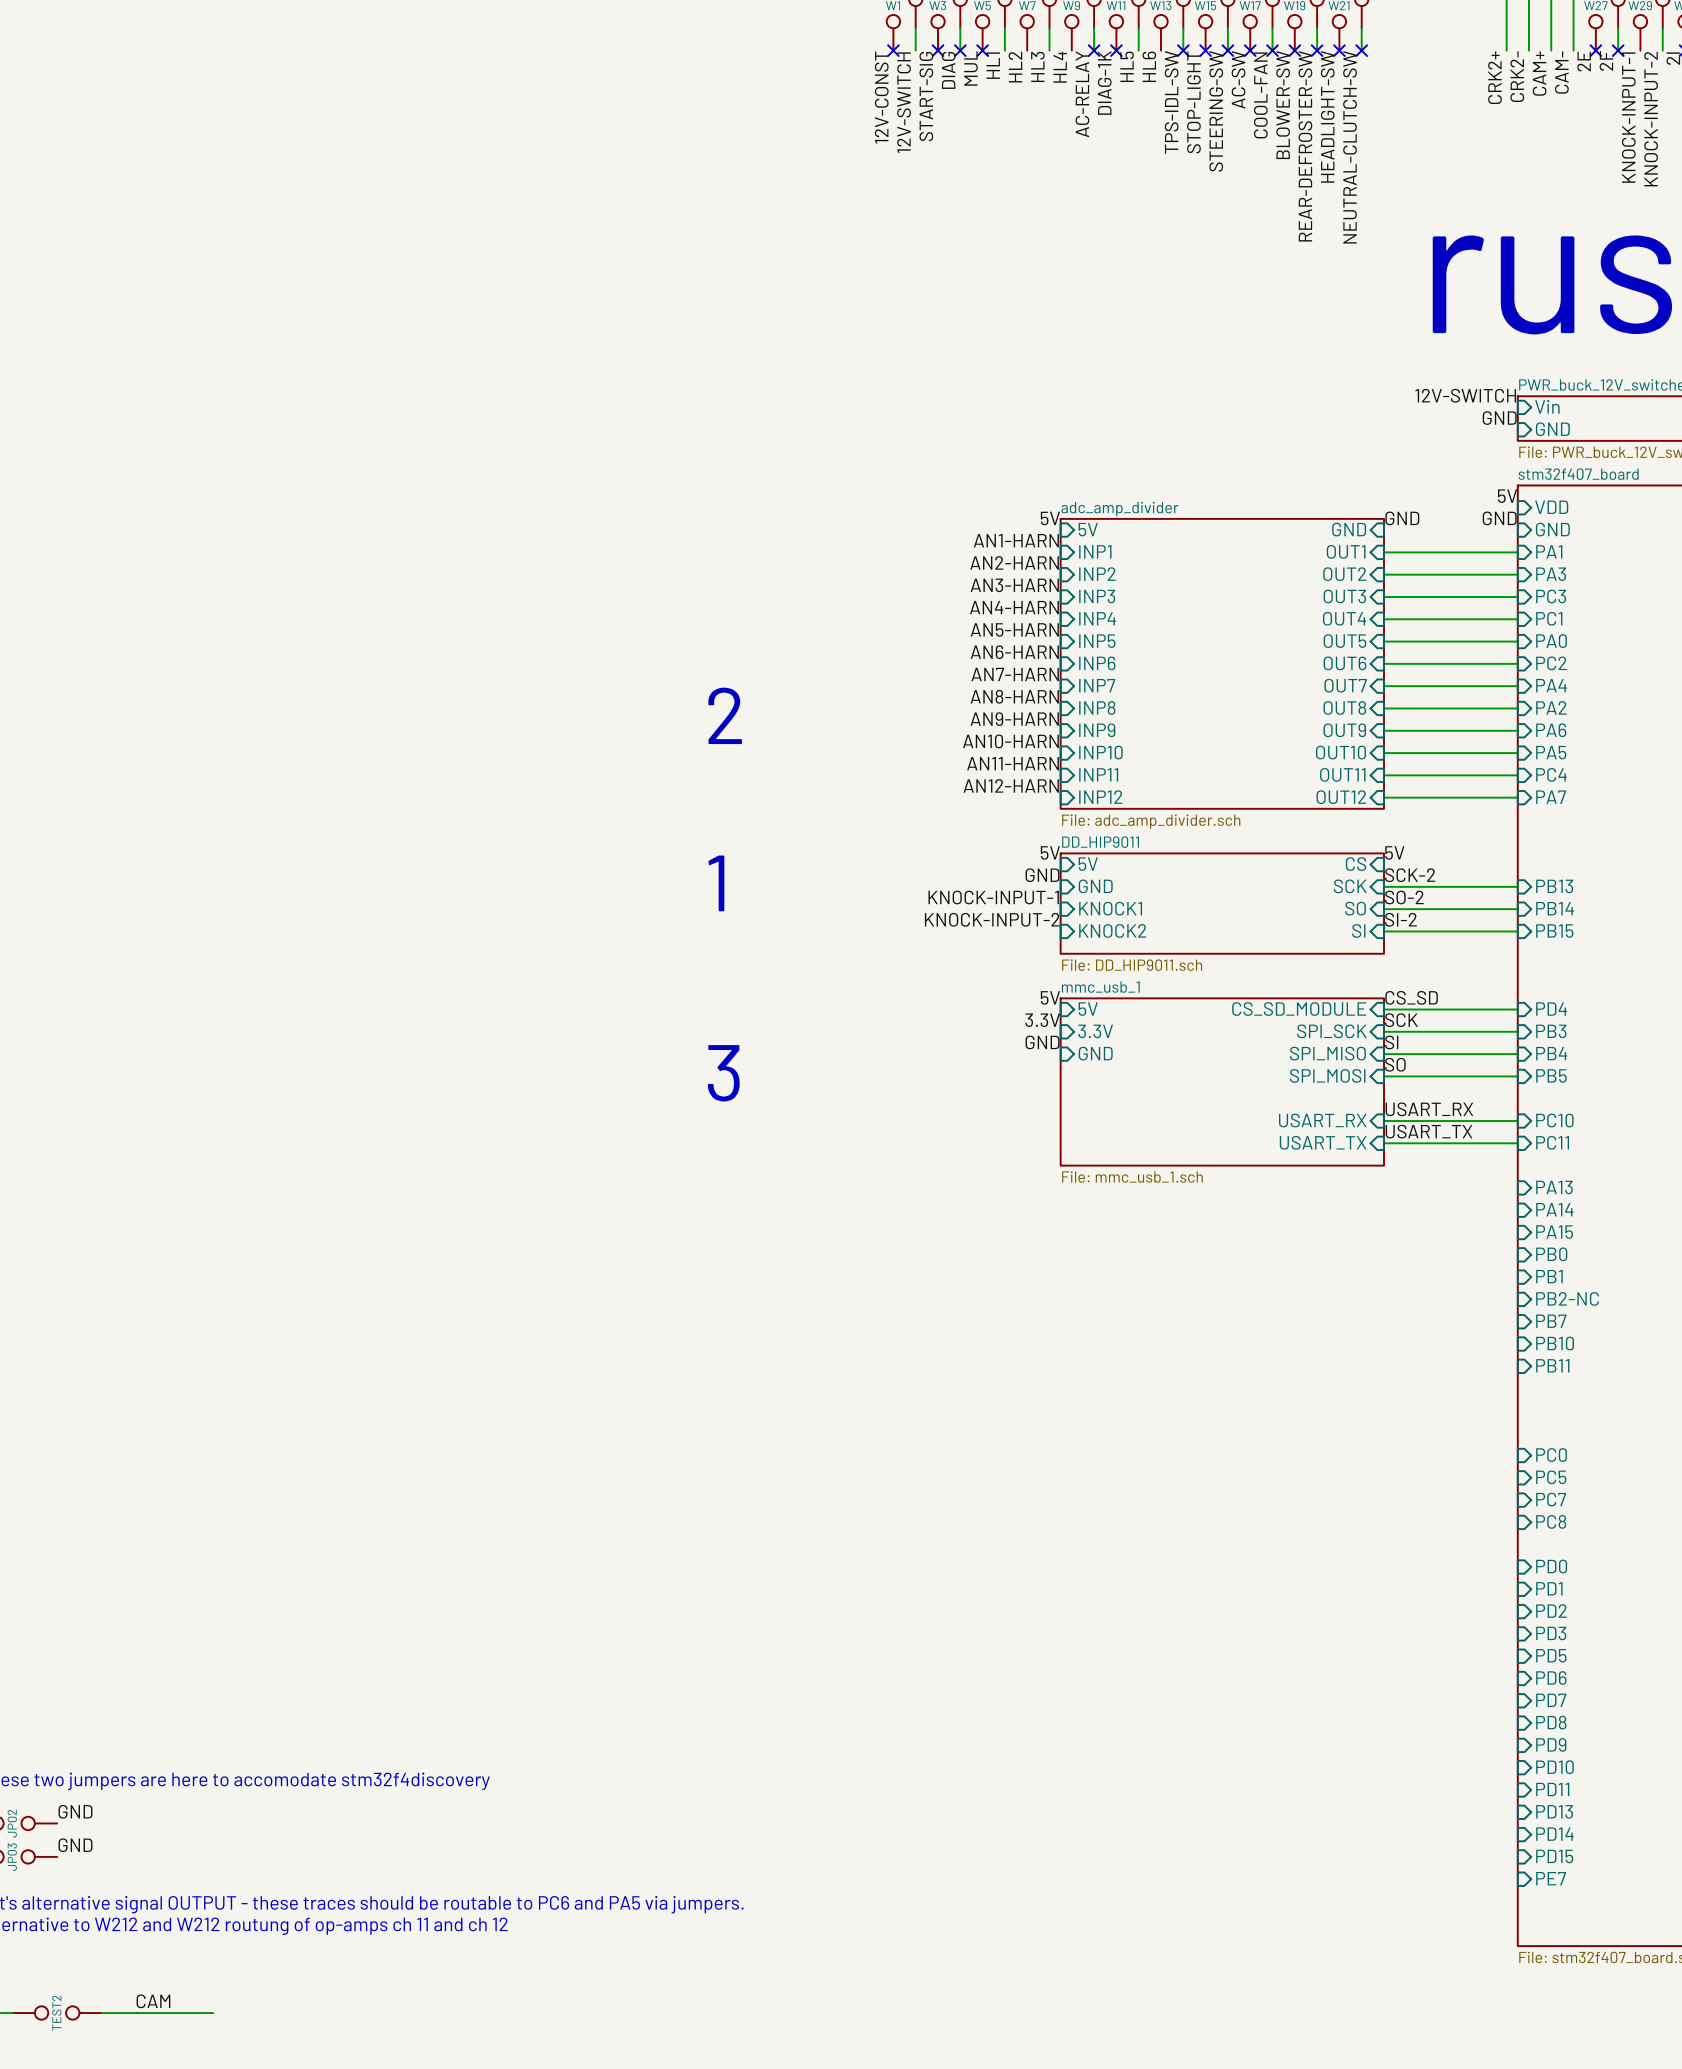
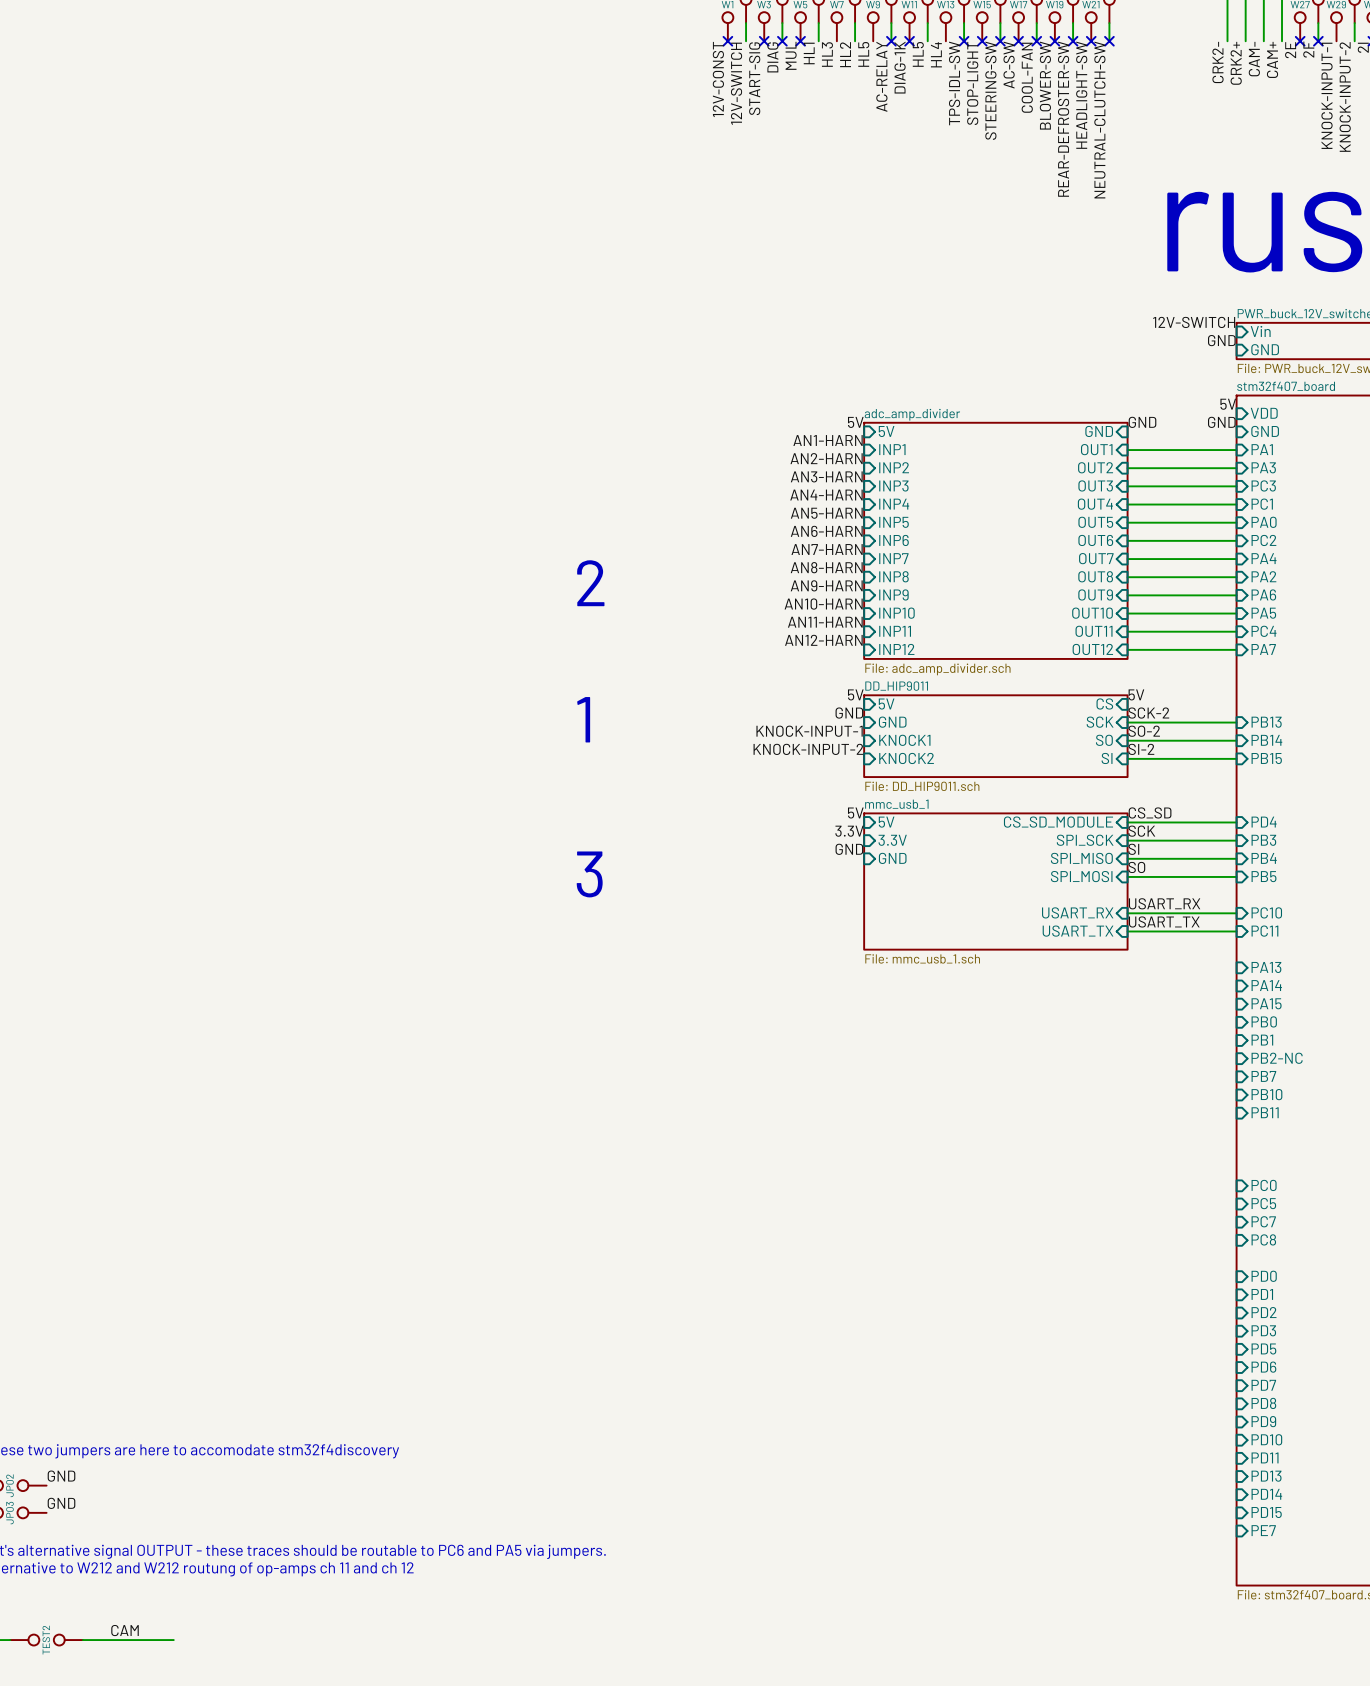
label: HL3 (1037, 66) -> HL2 (845, 54)
label: HL6 (1149, 66) -> HL4 (936, 54)
label: HL2 (1015, 67) -> HL3 (827, 54)
label: HL4 (1060, 67) -> HL5 (863, 54)
label: CAM- (1561, 72) -> CAM+ (1272, 59)
label: CAM+ (1539, 73) -> CAM- (1254, 59)
label: CRK2- (1517, 76) -> CRK2+ (1236, 63)
label: CRK2+ (1494, 77) -> CRK2- (1218, 62)

